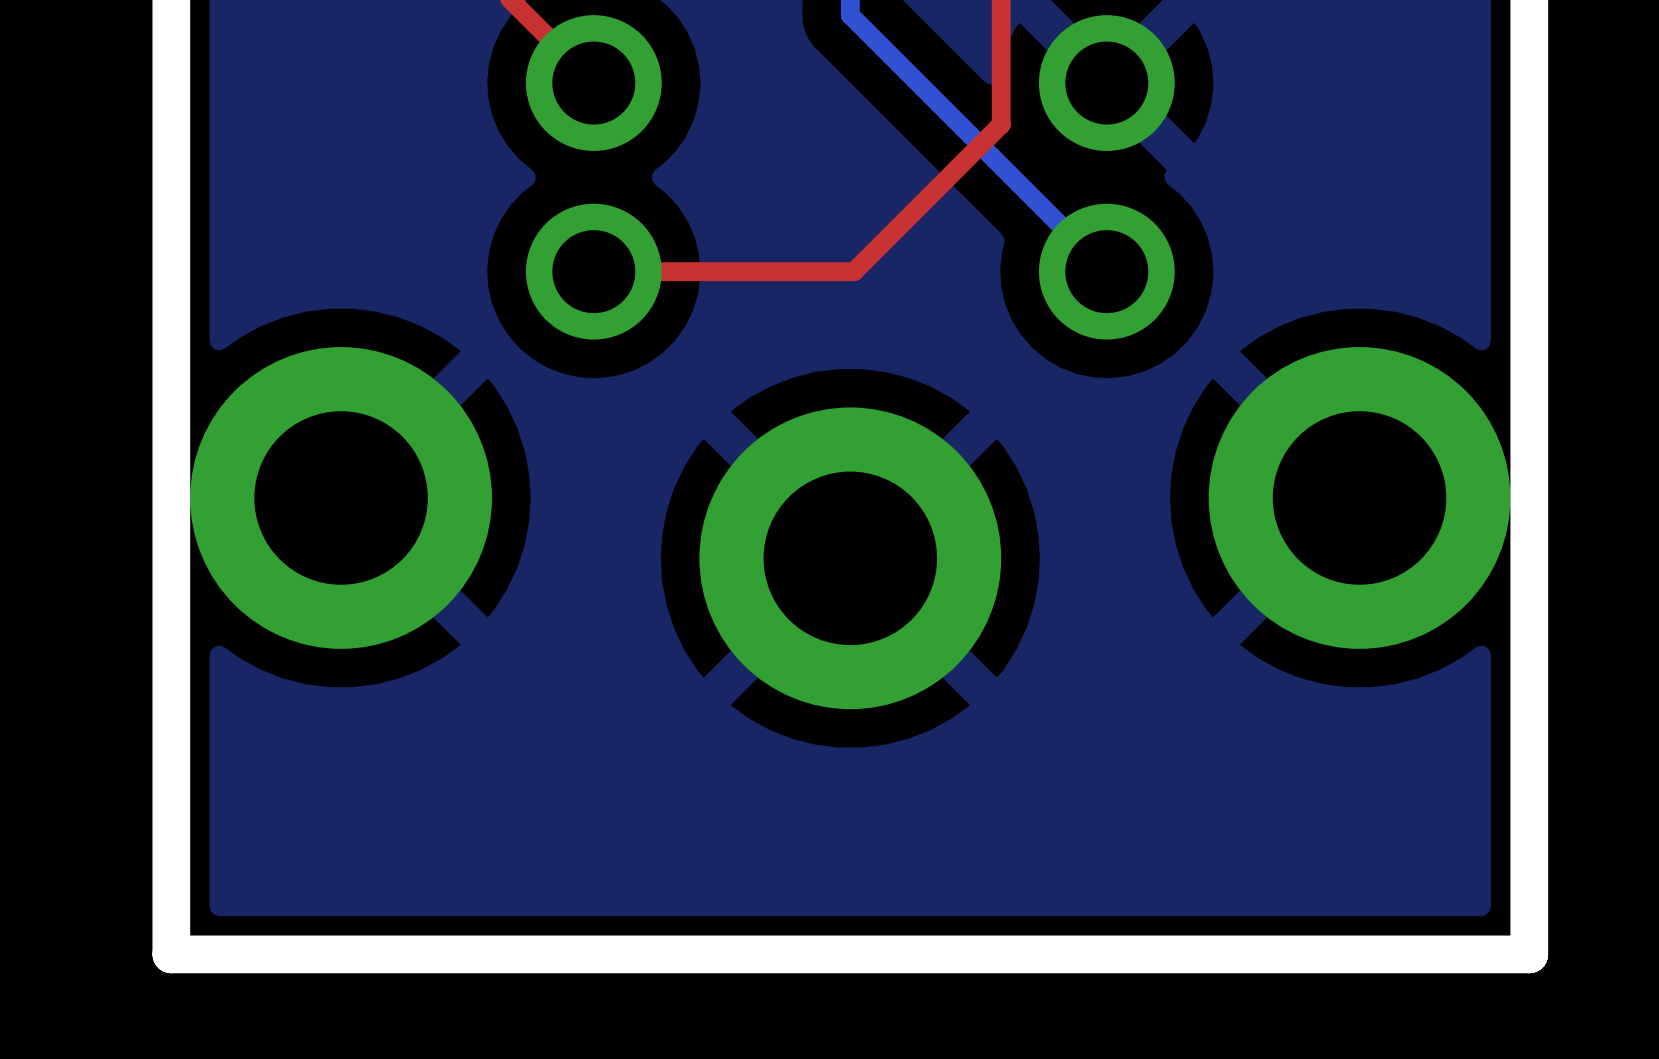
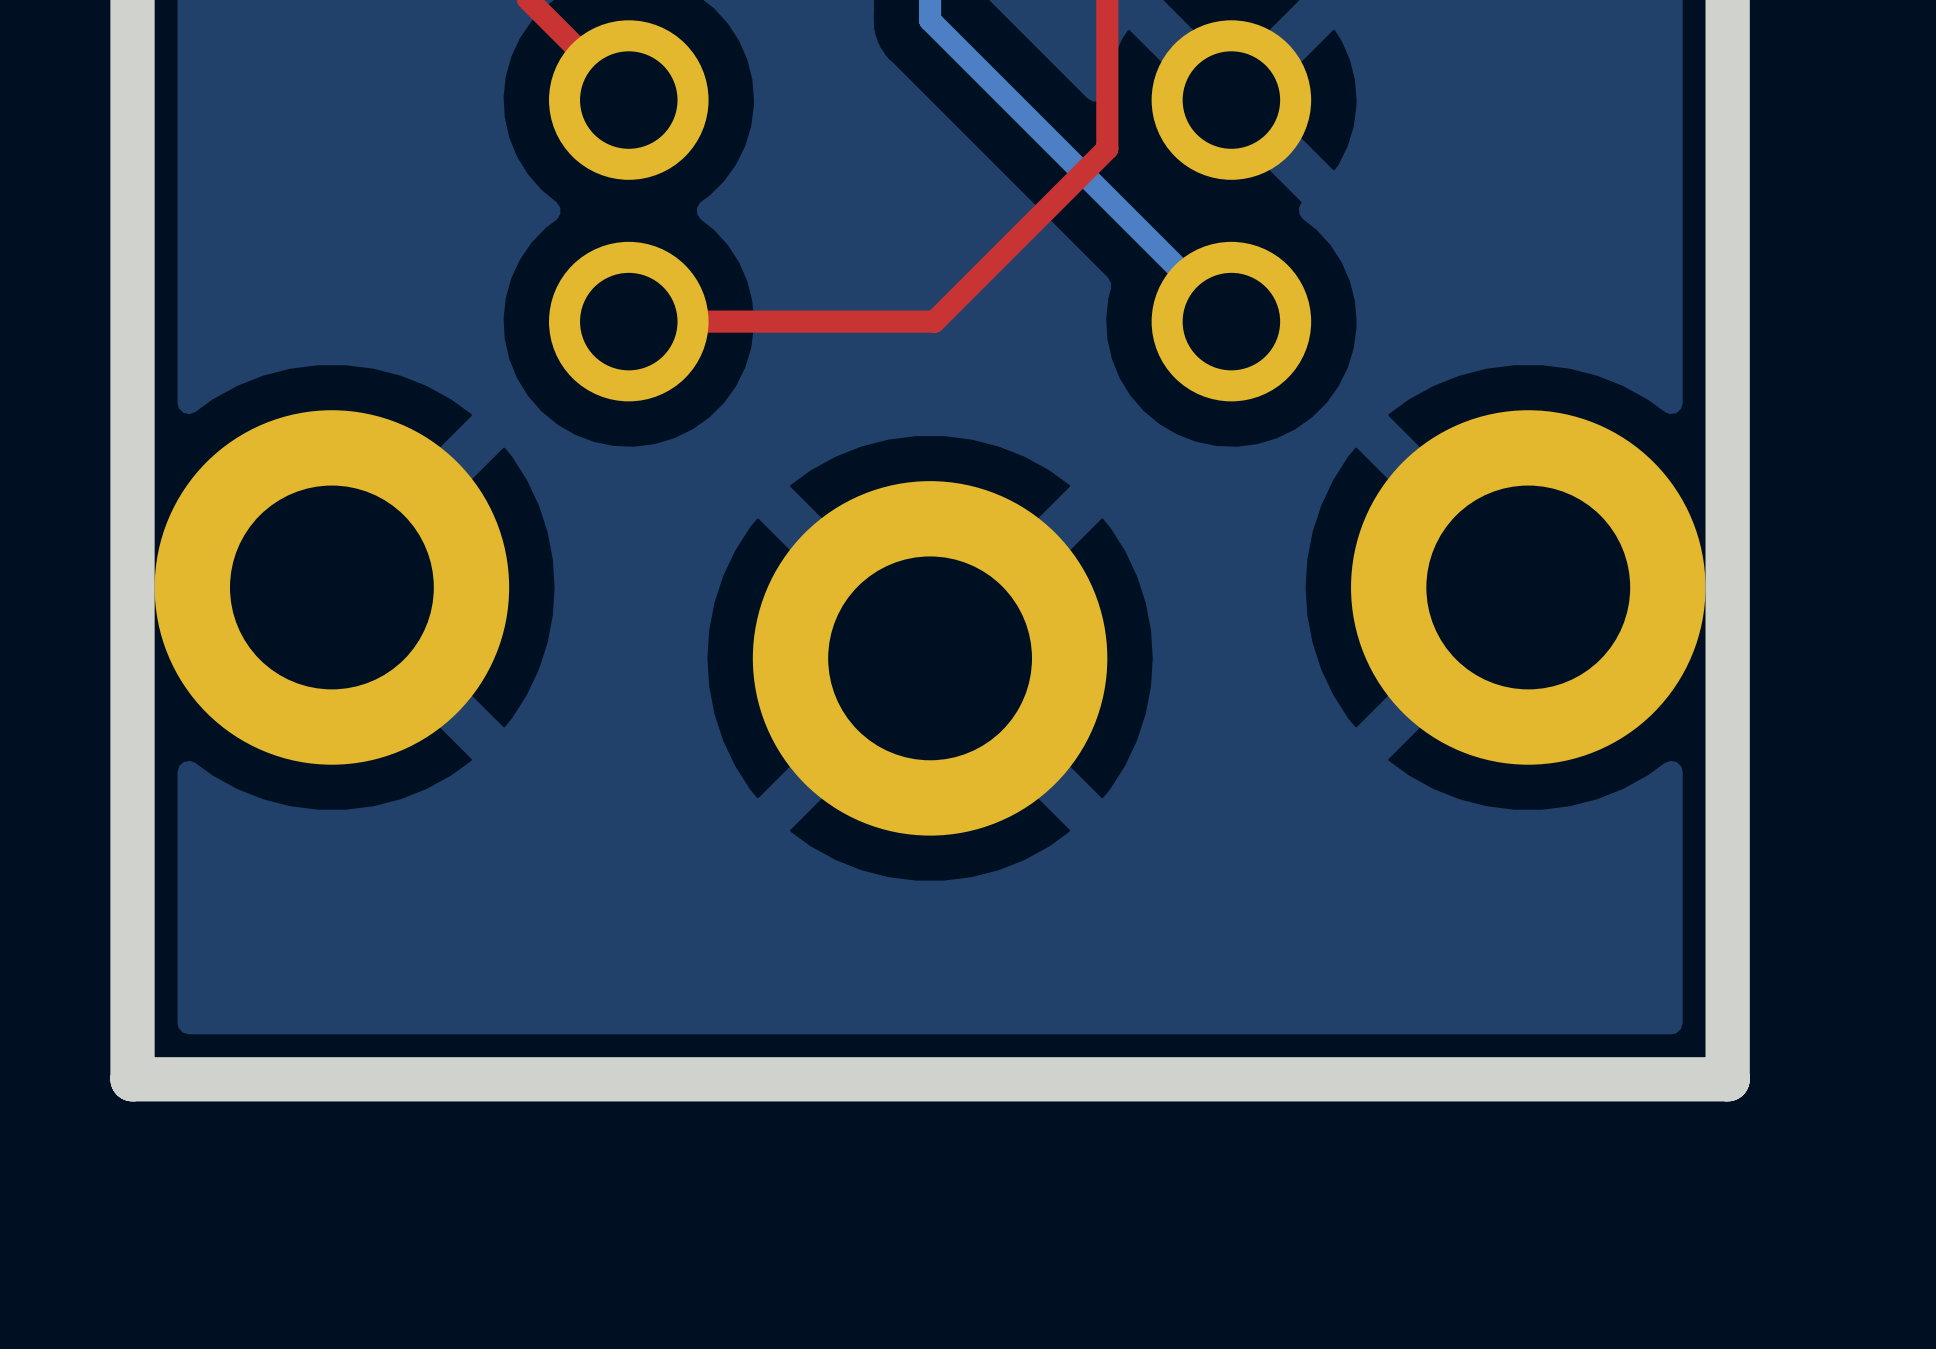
board edge: (171, 916) (171, 954) (1529, 954) (1529, 916) -> (132, 1079) (1727, 1079)

